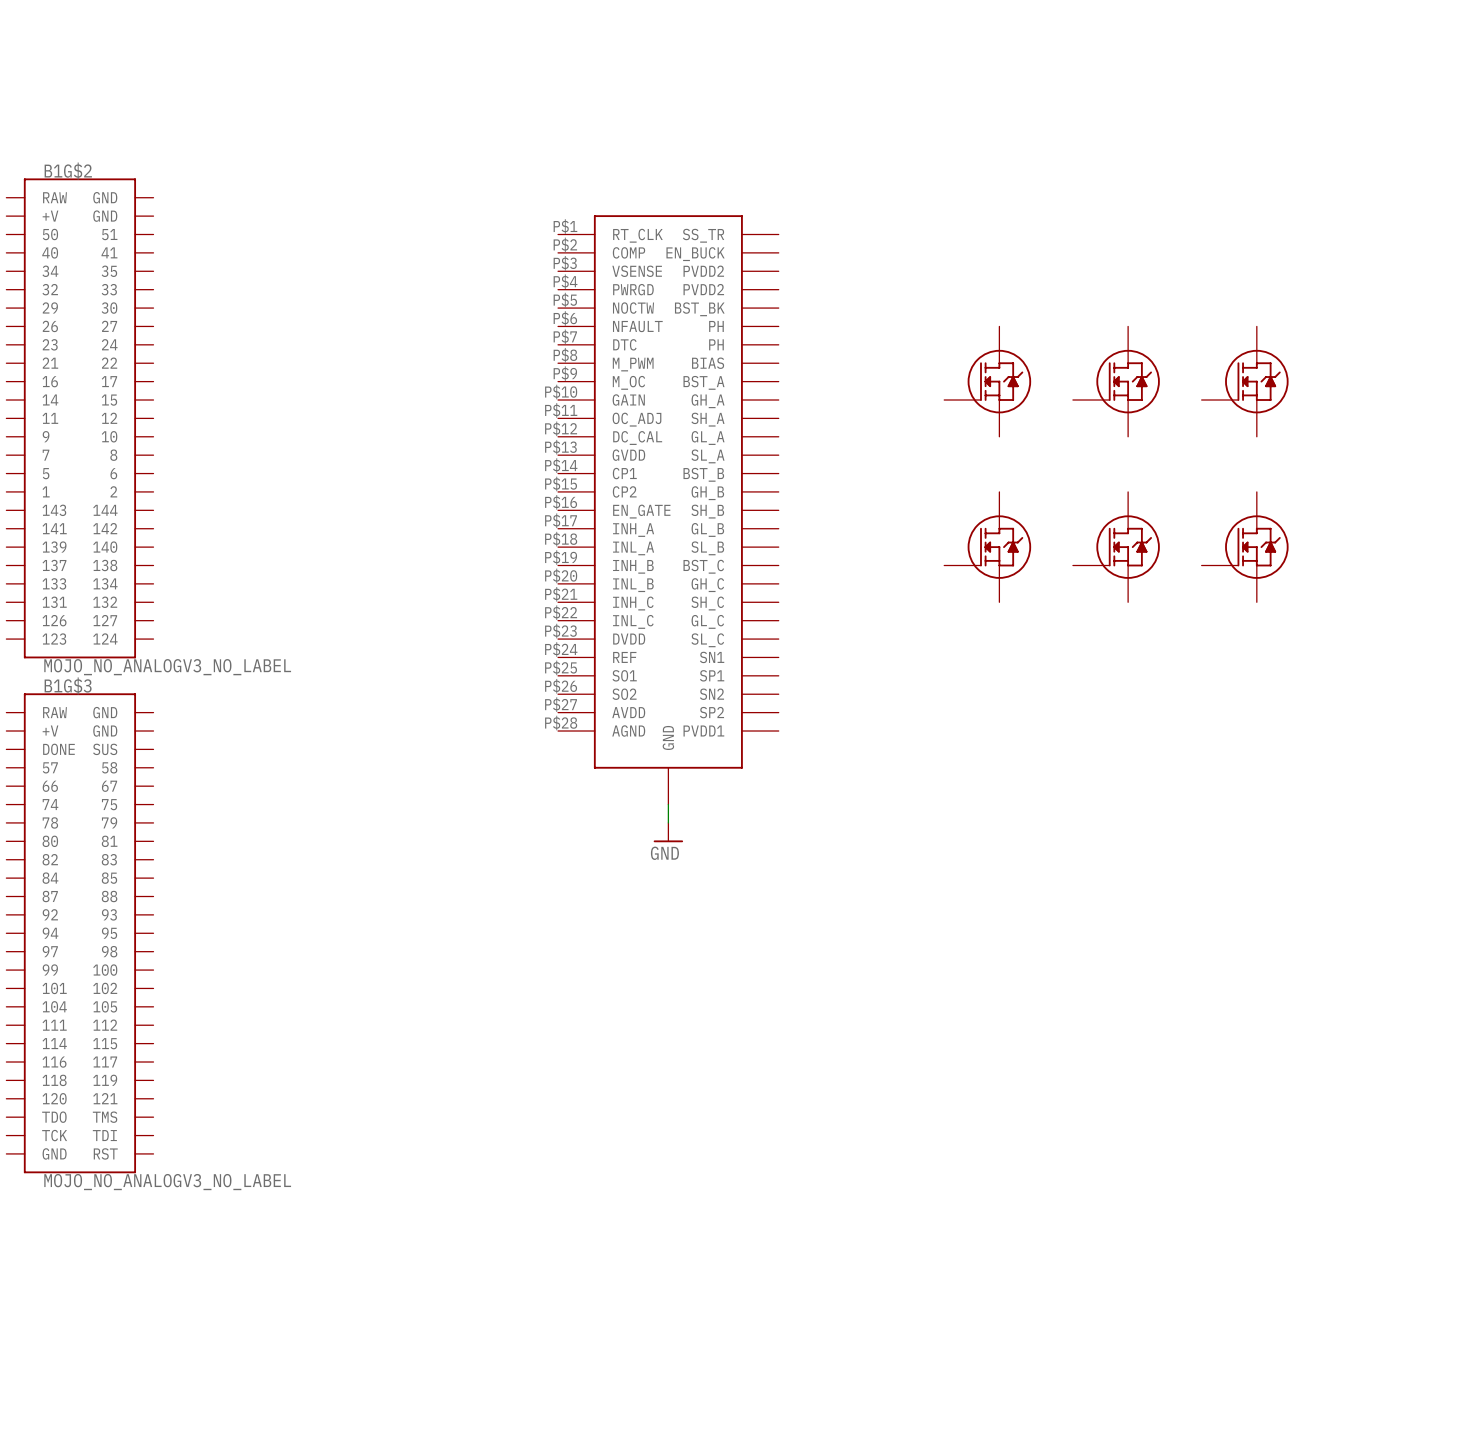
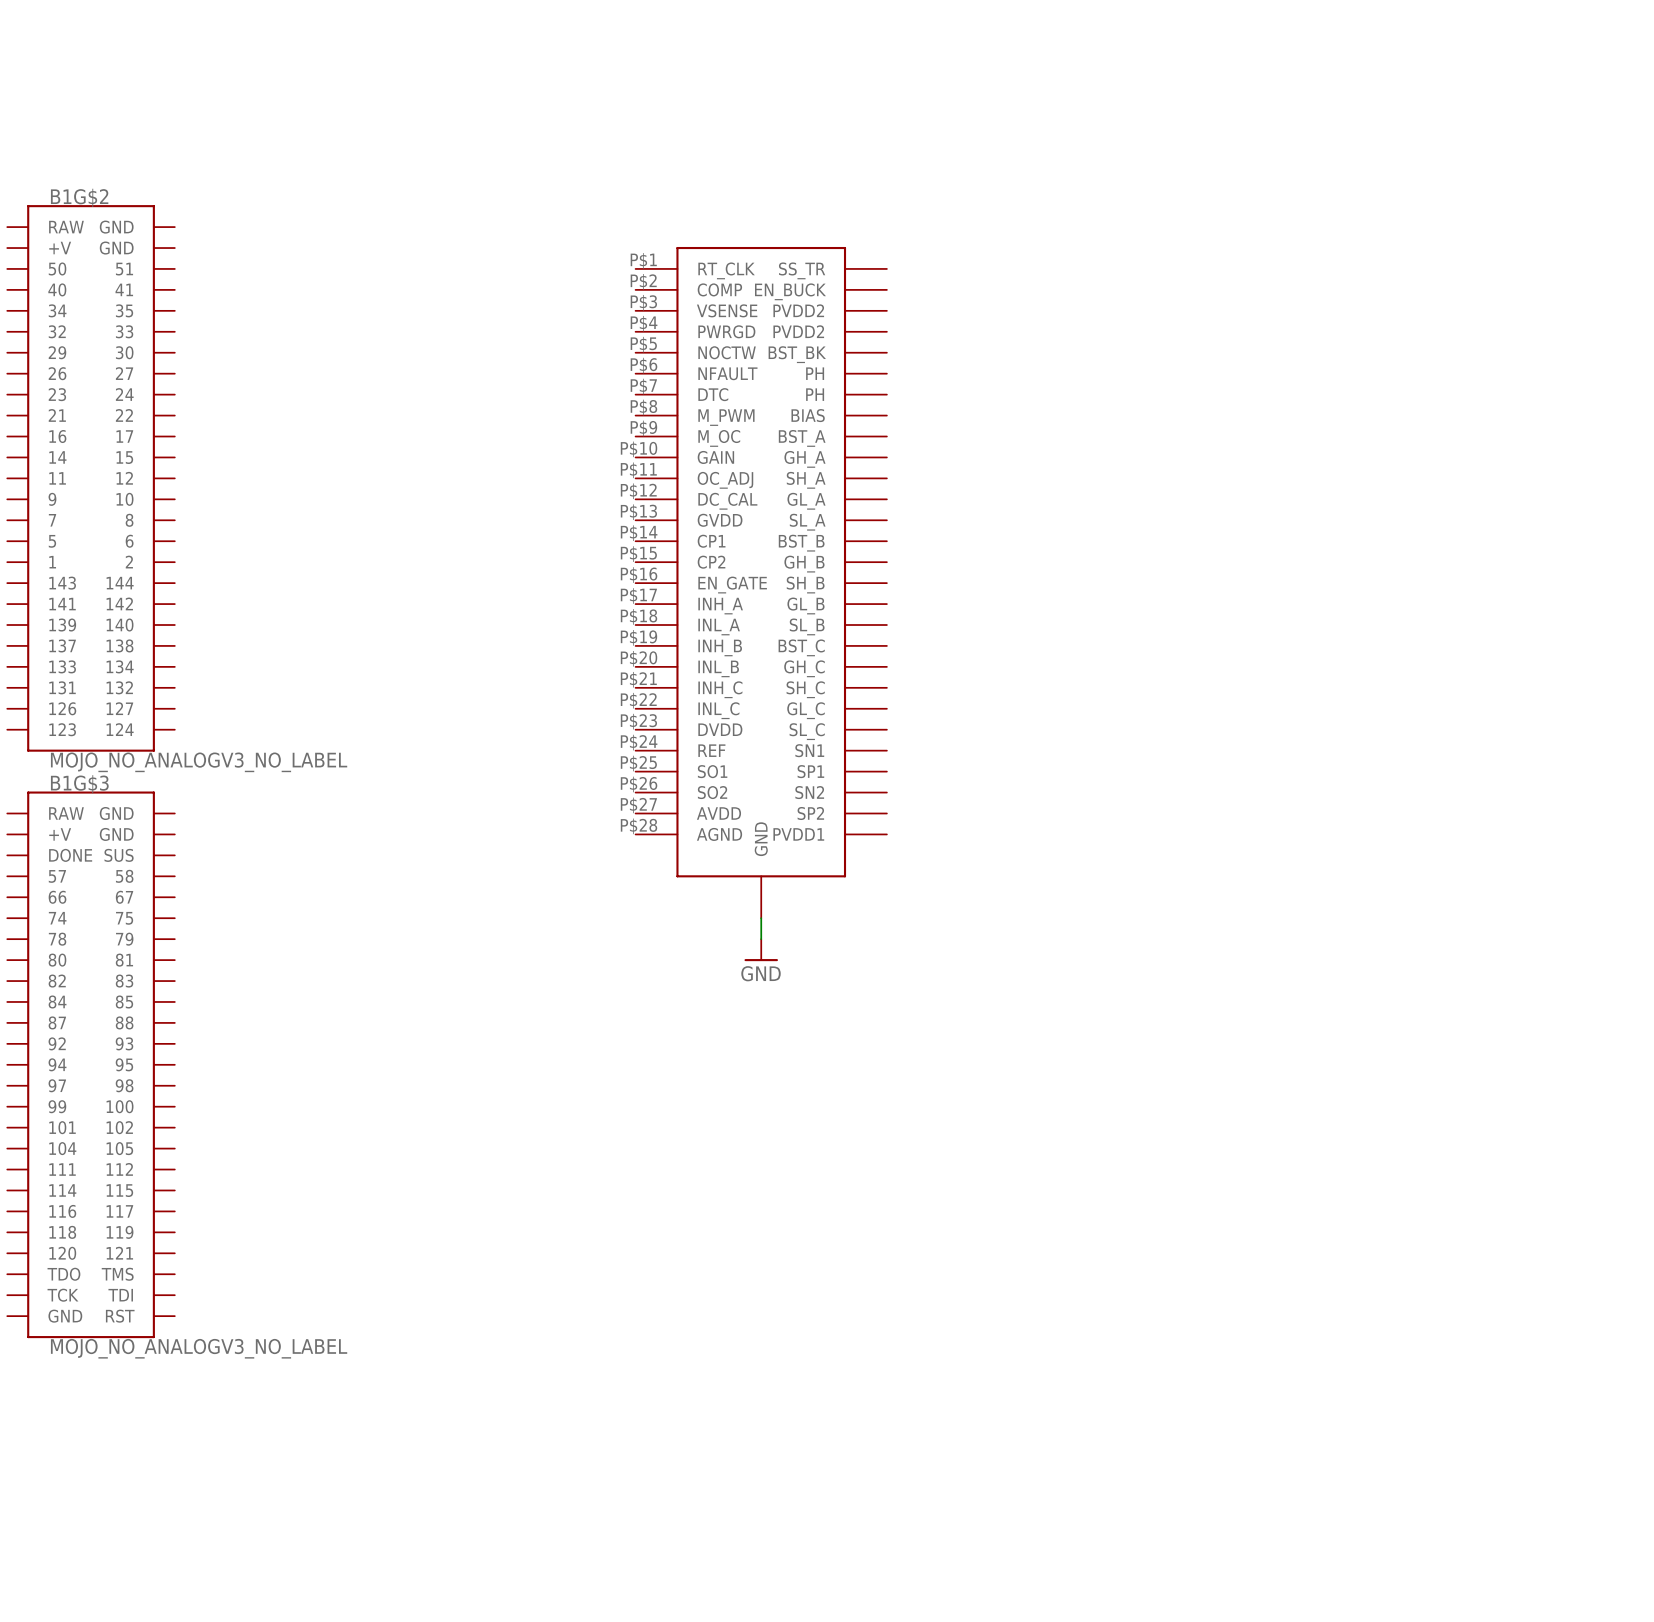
part: (987, 381) -> none
part: (1116, 381) -> none
part: (1245, 381) -> none
part: (987, 547) -> none
part: (1116, 547) -> none
part: (1245, 547) -> none

